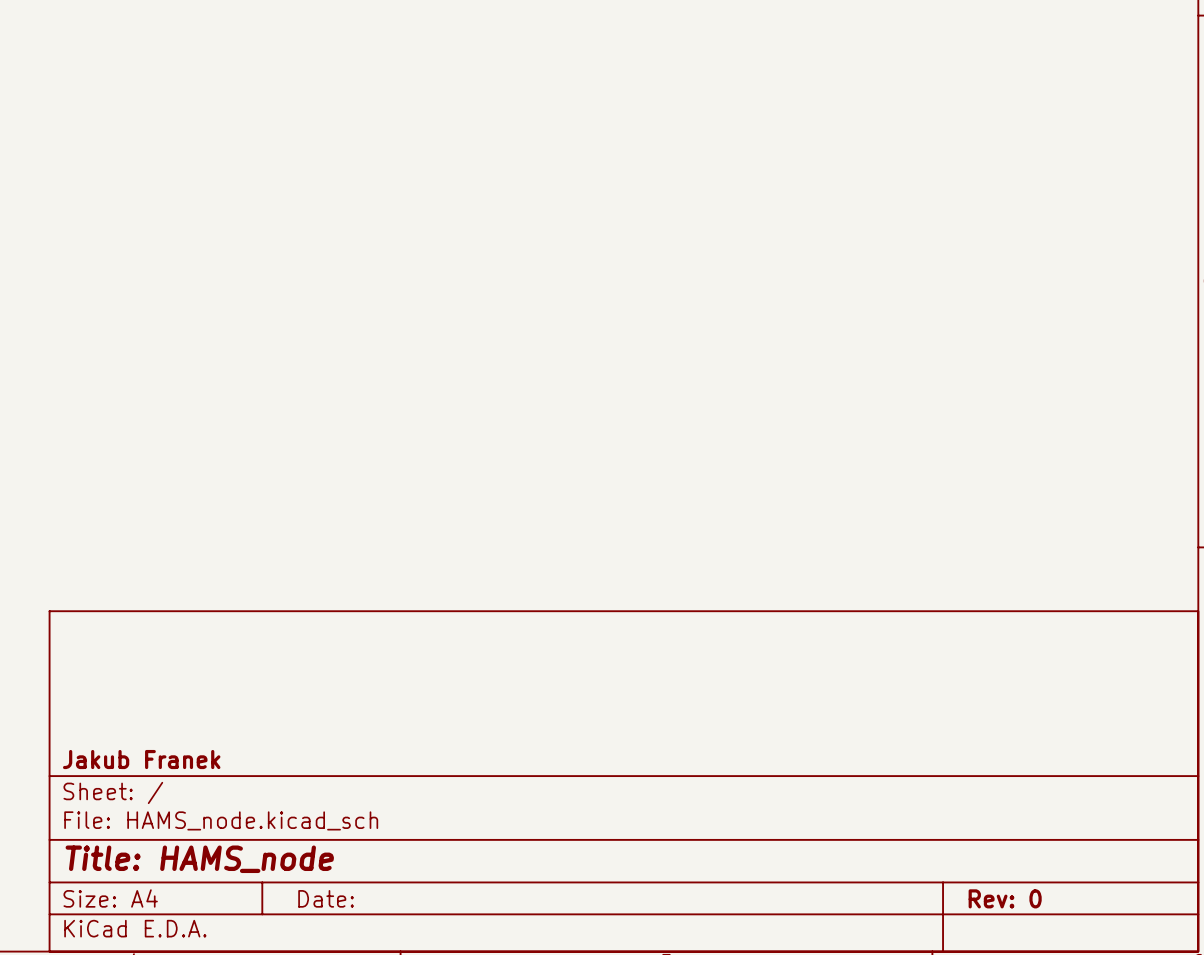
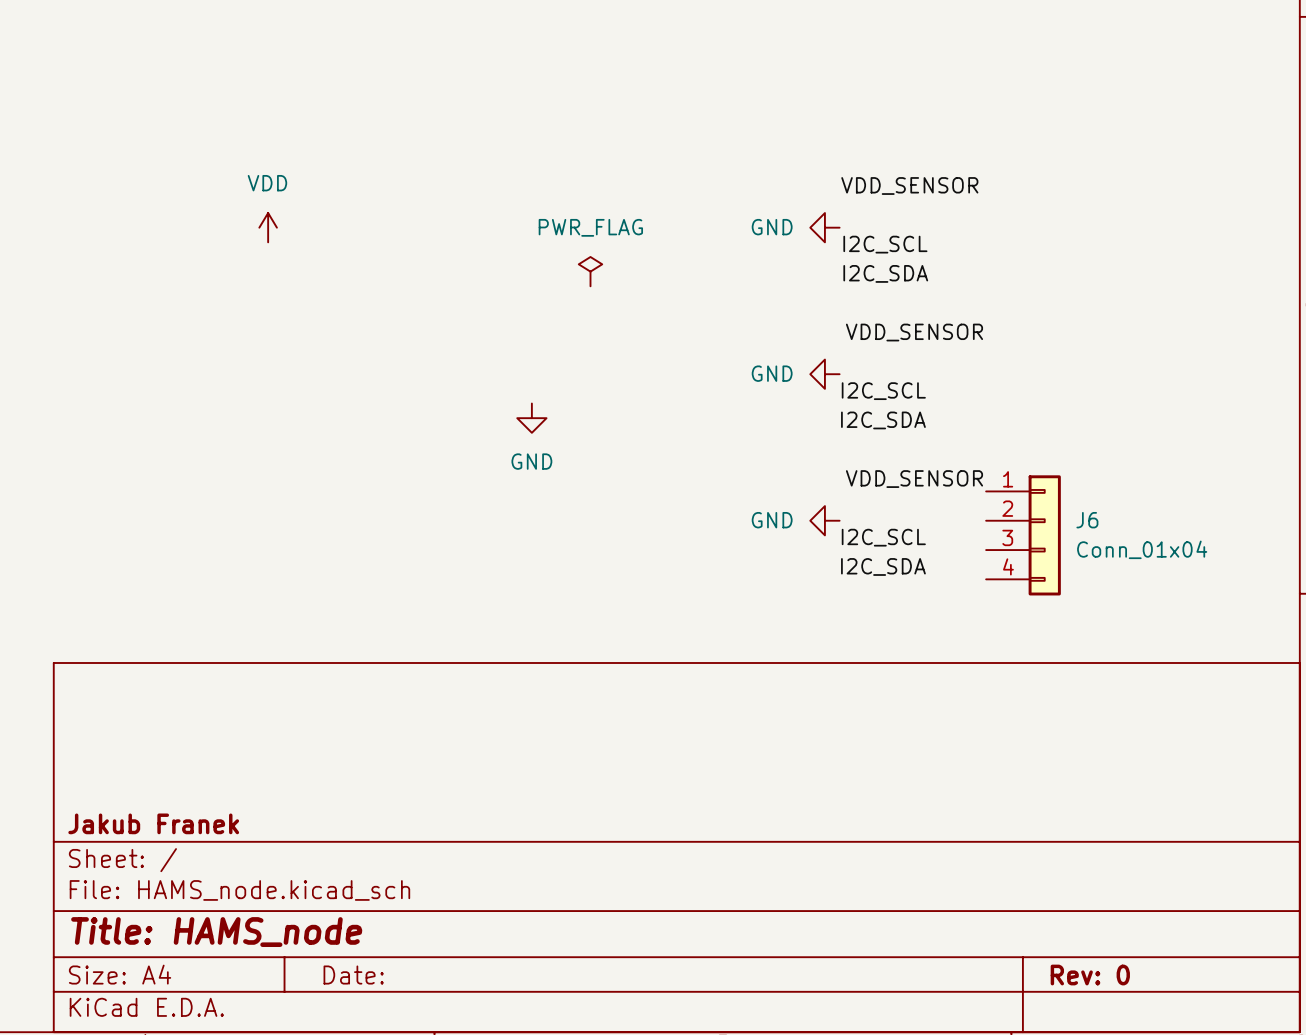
label: none -> VDD_SENSOR (909, 186)
power symbol: none -> VDD (268, 227)
power symbol: none -> GND (824, 227)
label: none -> I2C_SCL (885, 244)
power symbol: none -> PWR_FLAG (590, 271)
label: none -> I2C_SDA (885, 273)
label: none -> VDD_SENSOR (914, 332)
power symbol: none -> GND (824, 374)
label: none -> I2C_SCL (883, 391)
power symbol: none -> GND (531, 418)
label: none -> I2C_SDA (883, 420)
label: none -> VDD_SENSOR (914, 479)
power symbol: none -> GND (824, 520)
J6: none -> Conn_01x04 (1023, 535)
label: none -> I2C_SCL (883, 537)
label: none -> I2C_SDA (883, 566)

